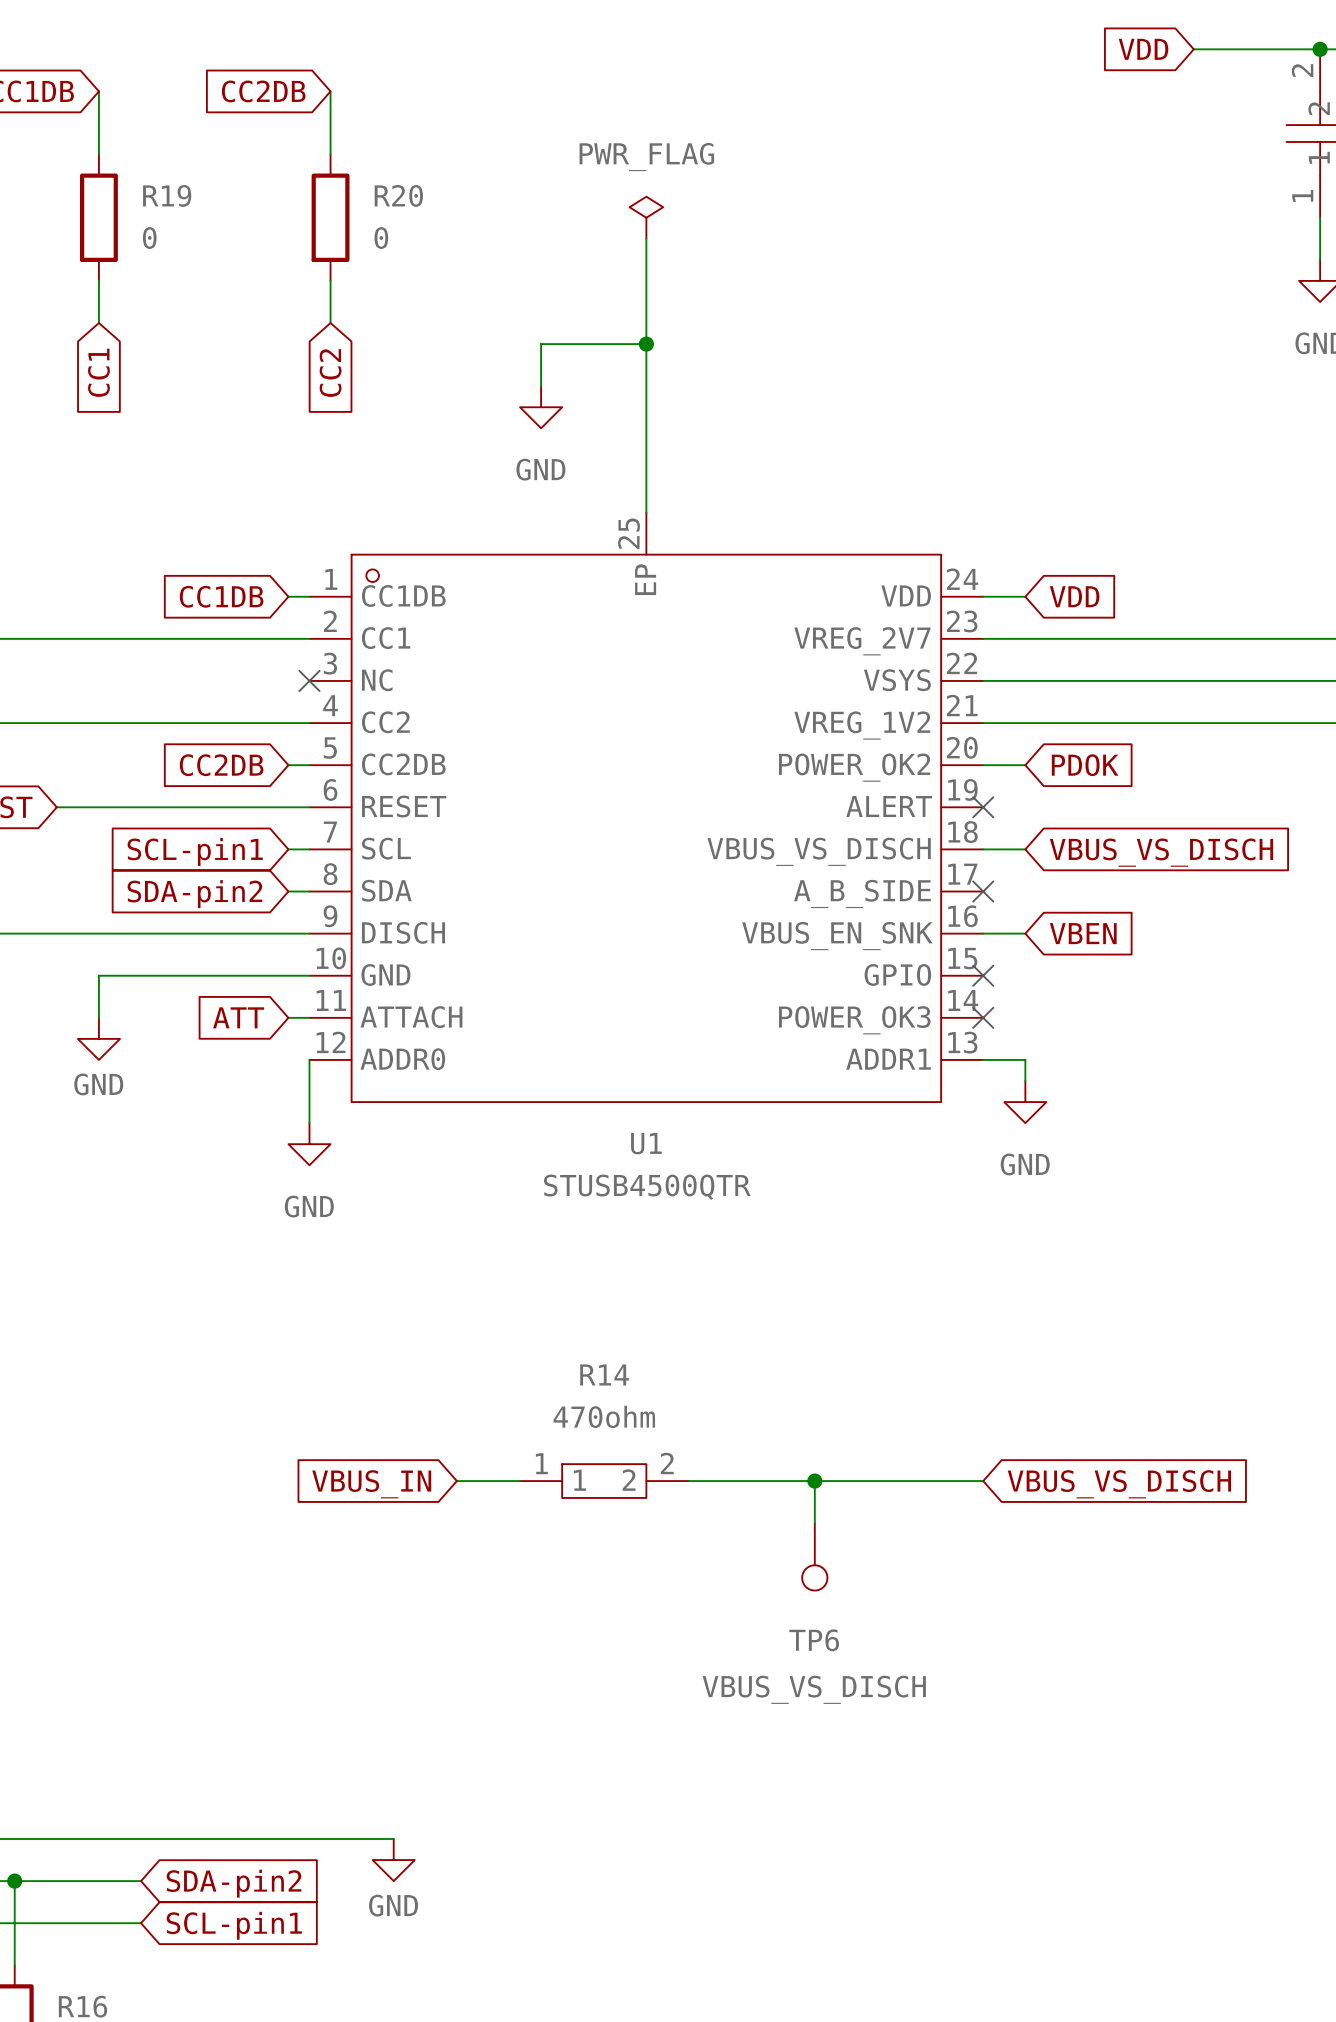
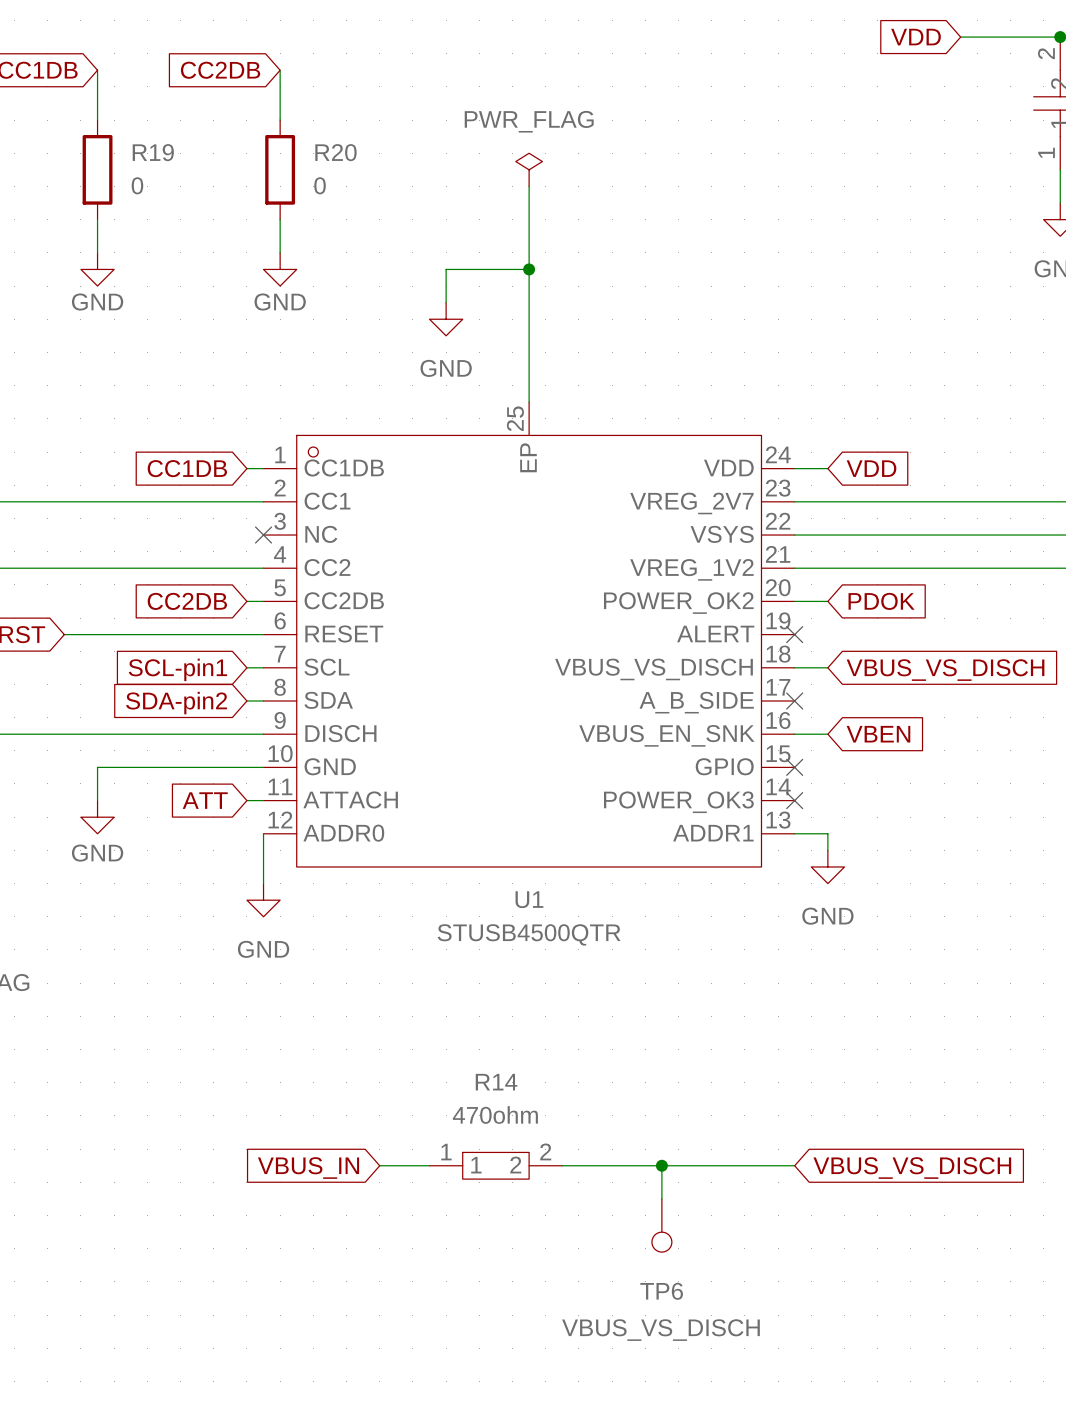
power symbol: none -> GND (97, 269)
power symbol: none -> GND (280, 269)
global label: CC1 (98, 372) -> none
global label: CC2 (330, 373) -> none

